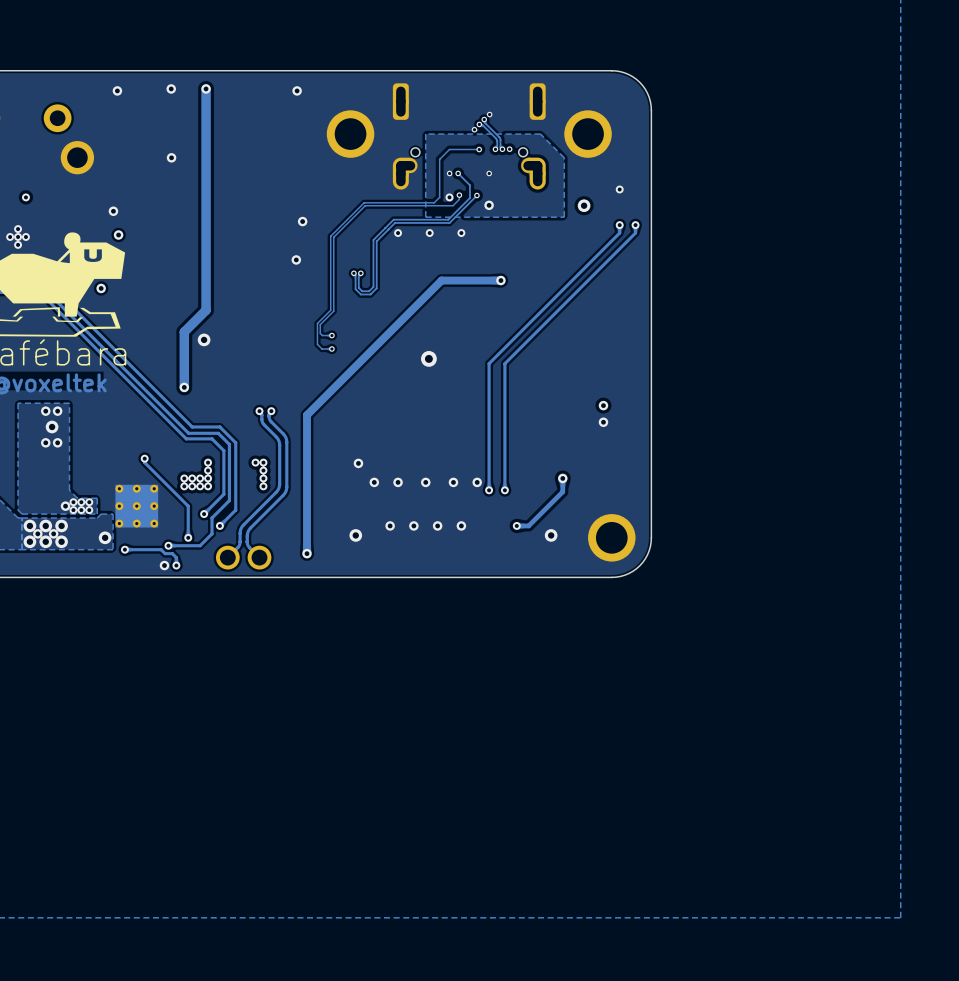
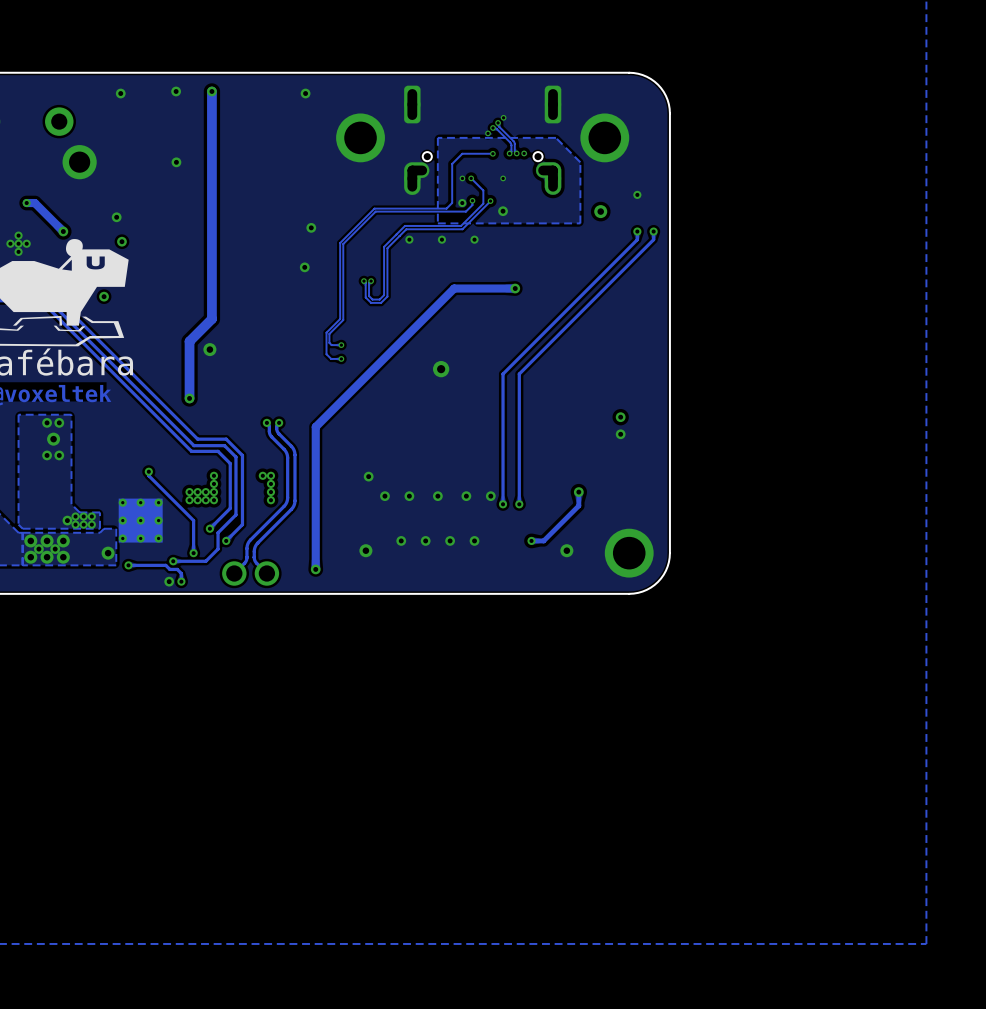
track: none -> (26, 203) (34, 203) (63, 231)
via: none -> (63, 231)

